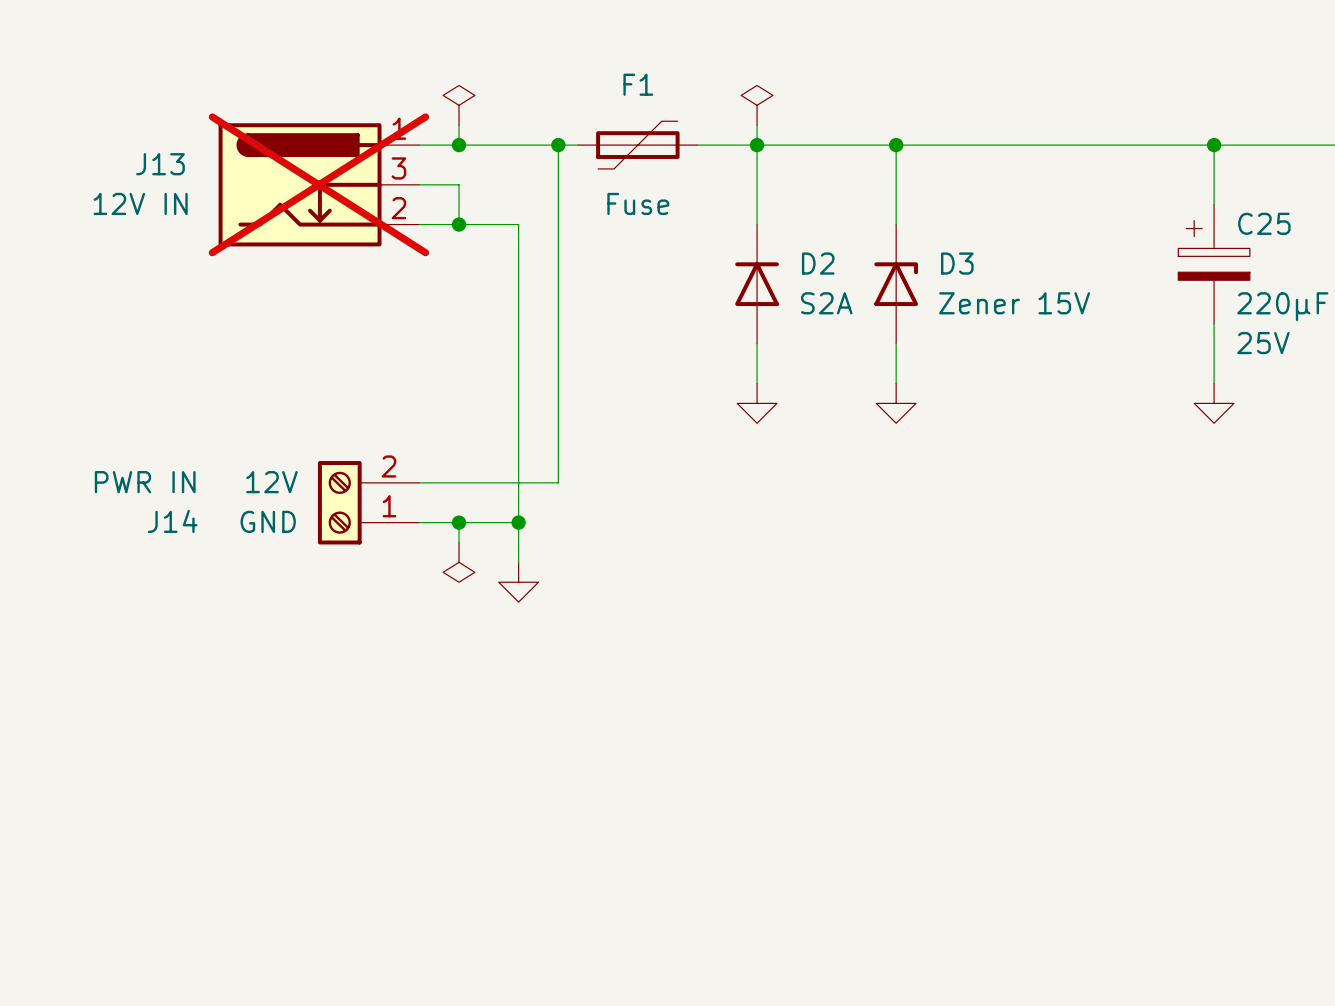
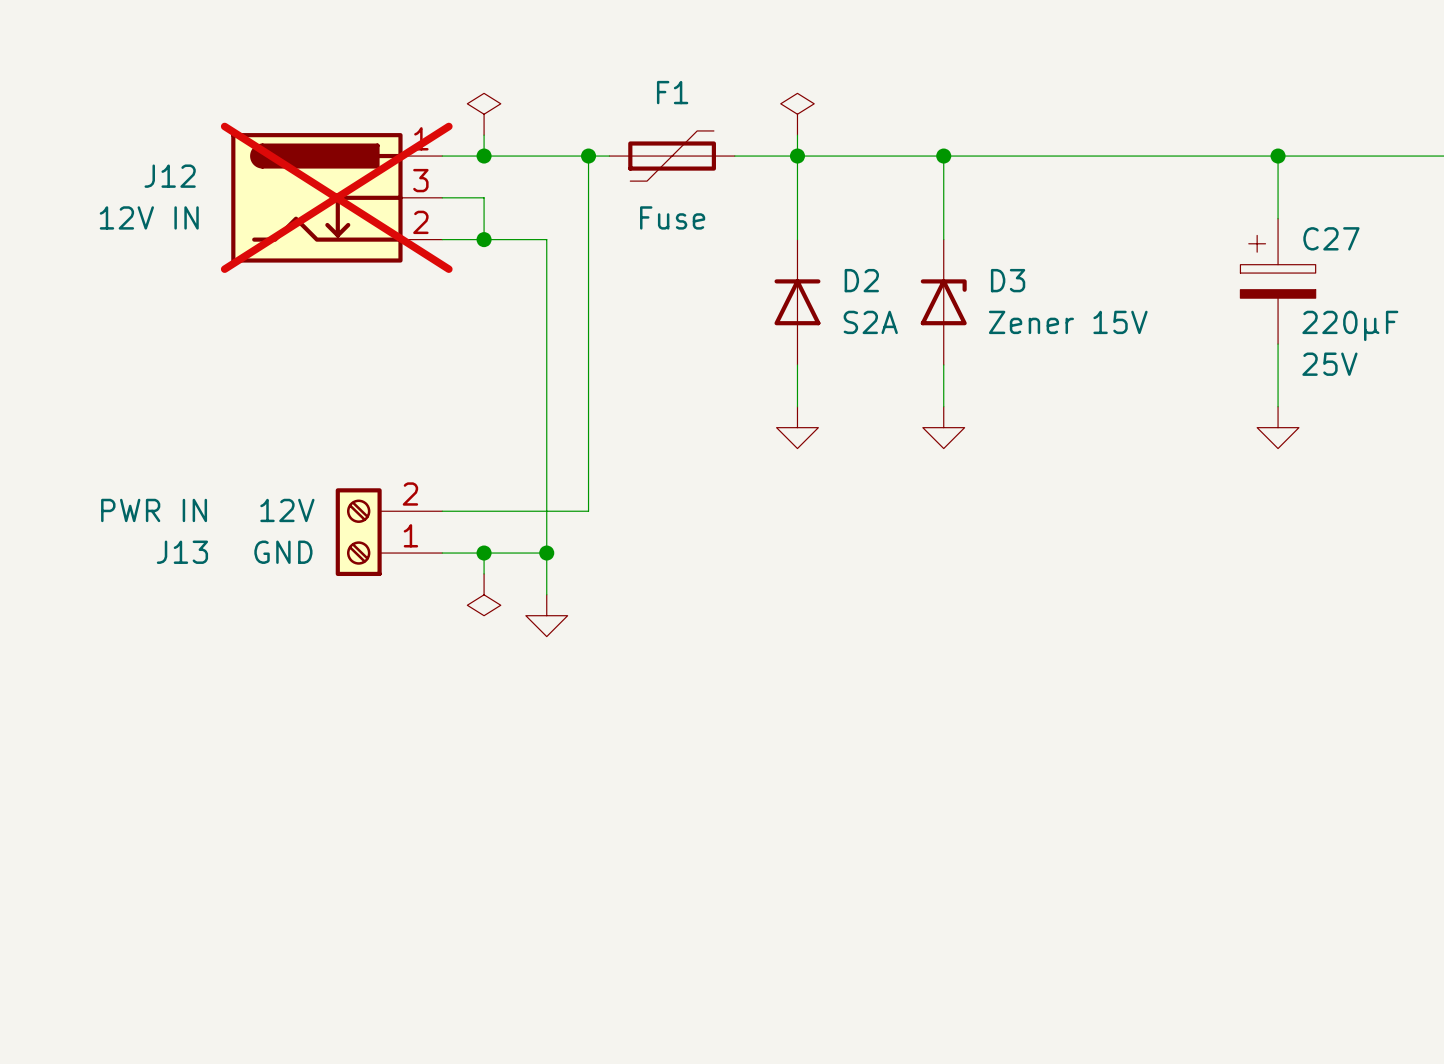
J13 name: J13 (160, 164) -> J12 (170, 176)
C25 name: C25 (1264, 223) -> C27 (1331, 238)
J14 name: J14 (172, 521) -> J13 (182, 552)

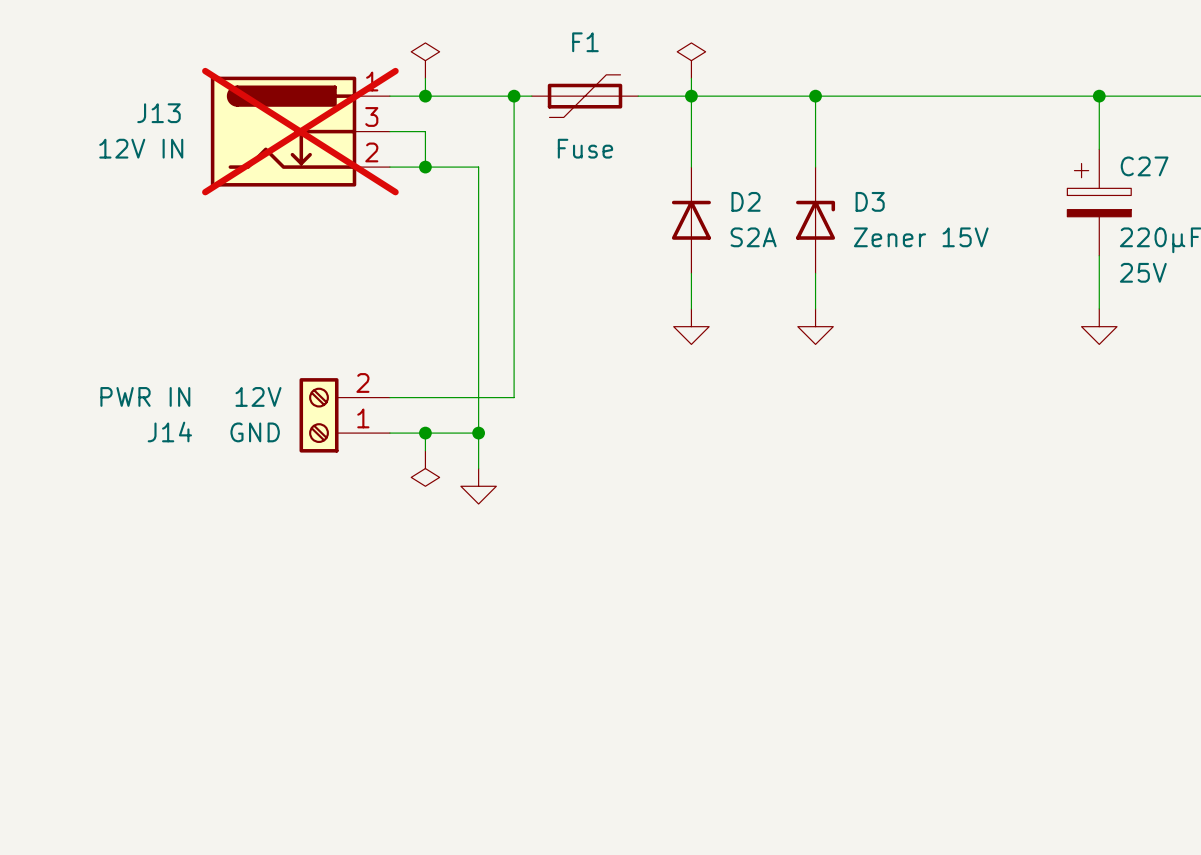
J12 name: J12 (170, 176) -> J13 (159, 113)
J13 name: J13 (182, 552) -> J14 (169, 431)

